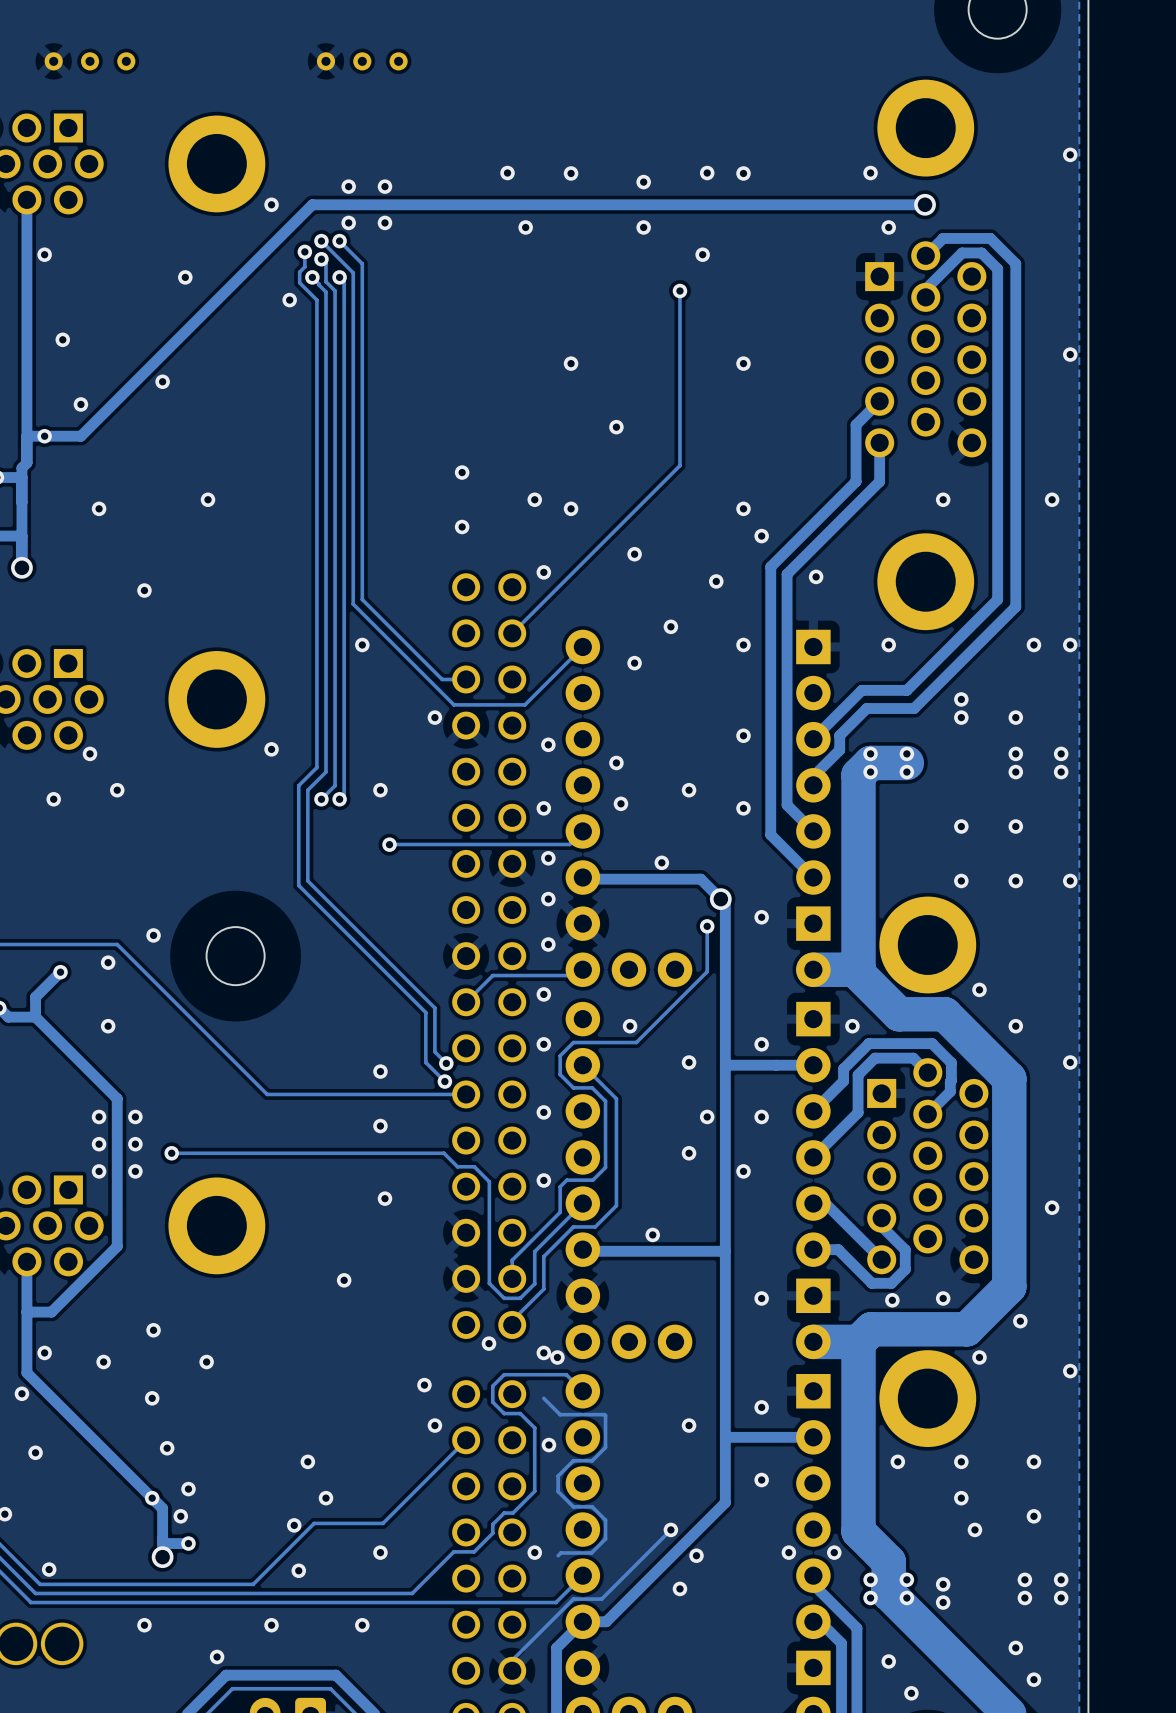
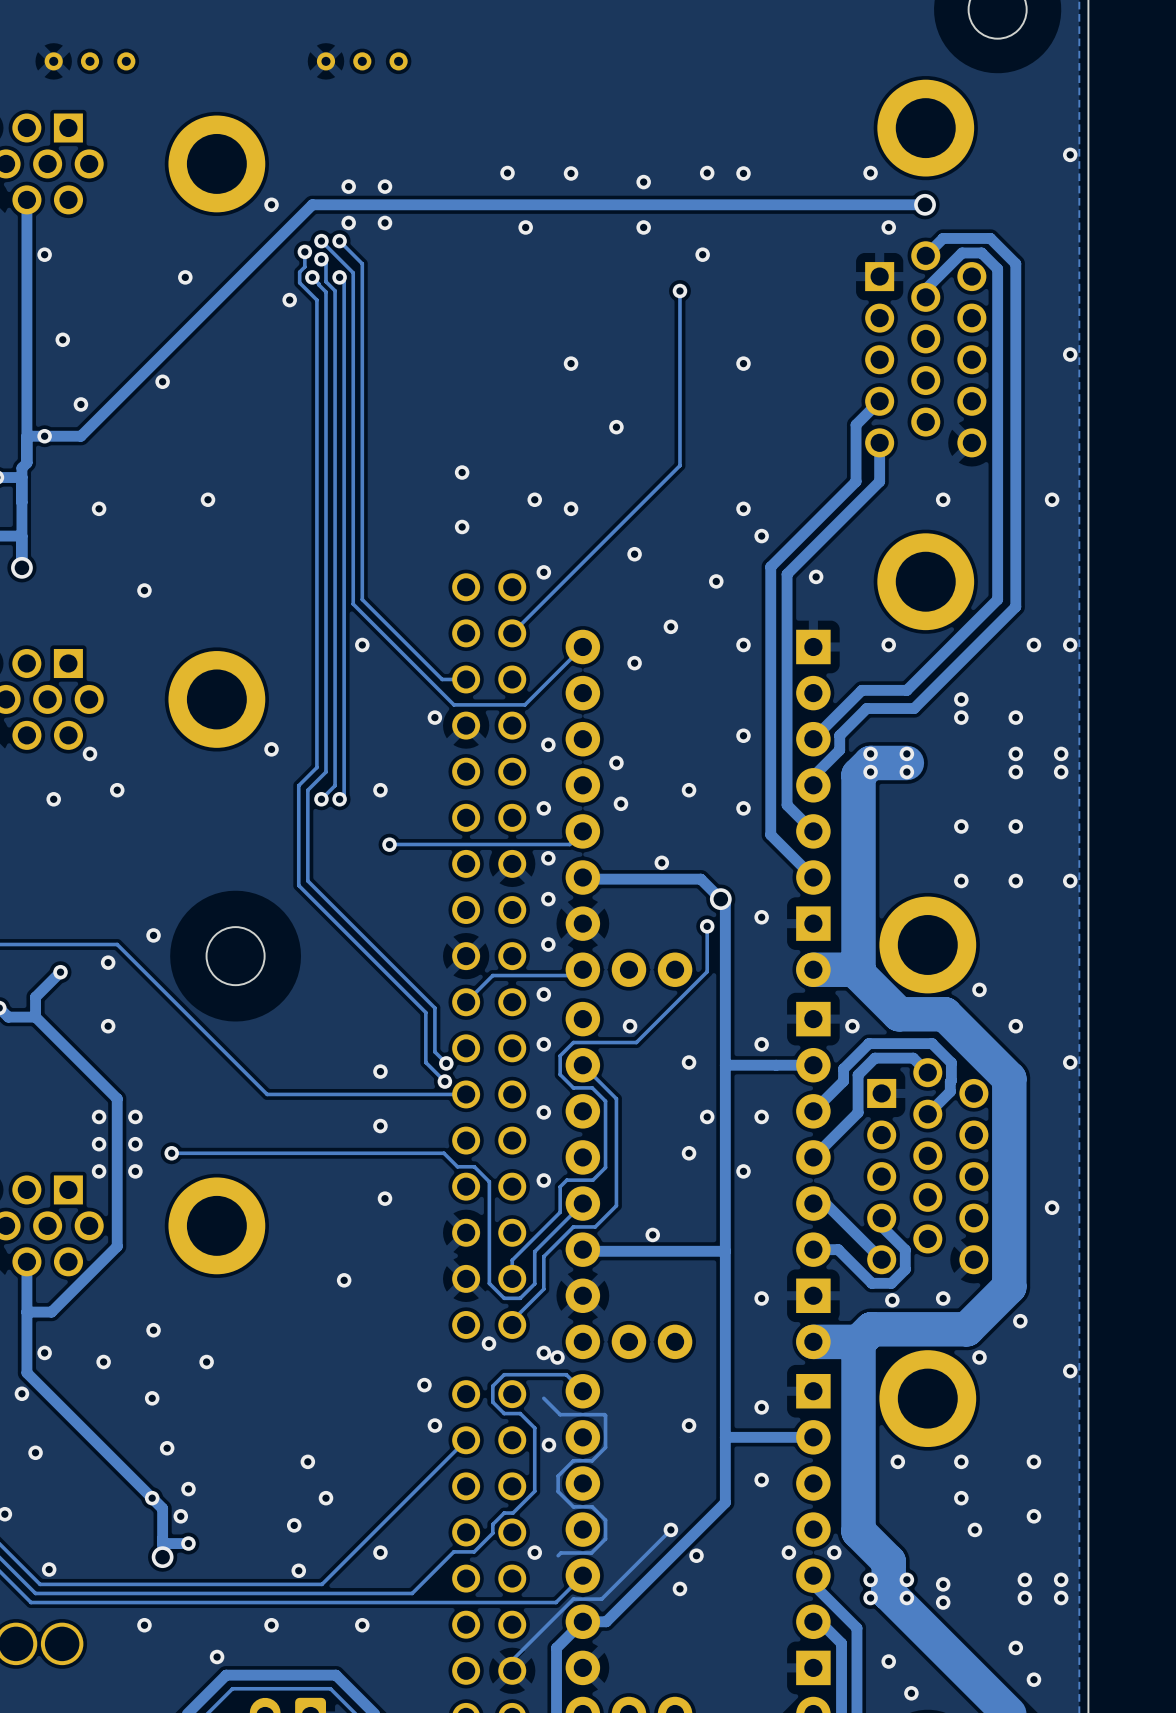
track: (382, 1523) (314, 1523) (253, 1584) -> (382, 1523) (322, 1584) (253, 1584)

